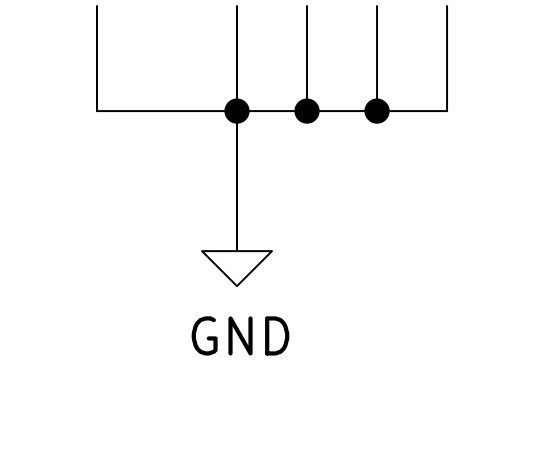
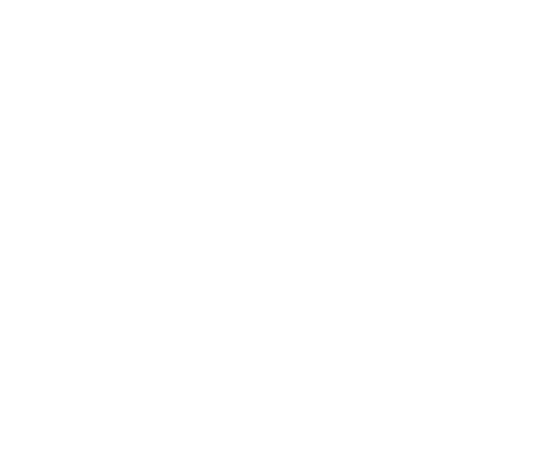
wire: (96, 6) (96, 111) (447, 111) (447, 6) -> none
wire: (237, 6) (237, 216) -> none
wire: (307, 6) (307, 111) -> none
wire: (377, 6) (377, 111) -> none
junction: (237, 111) -> none
junction: (307, 111) -> none
junction: (377, 111) -> none
power symbol: GND (237, 251) -> none

